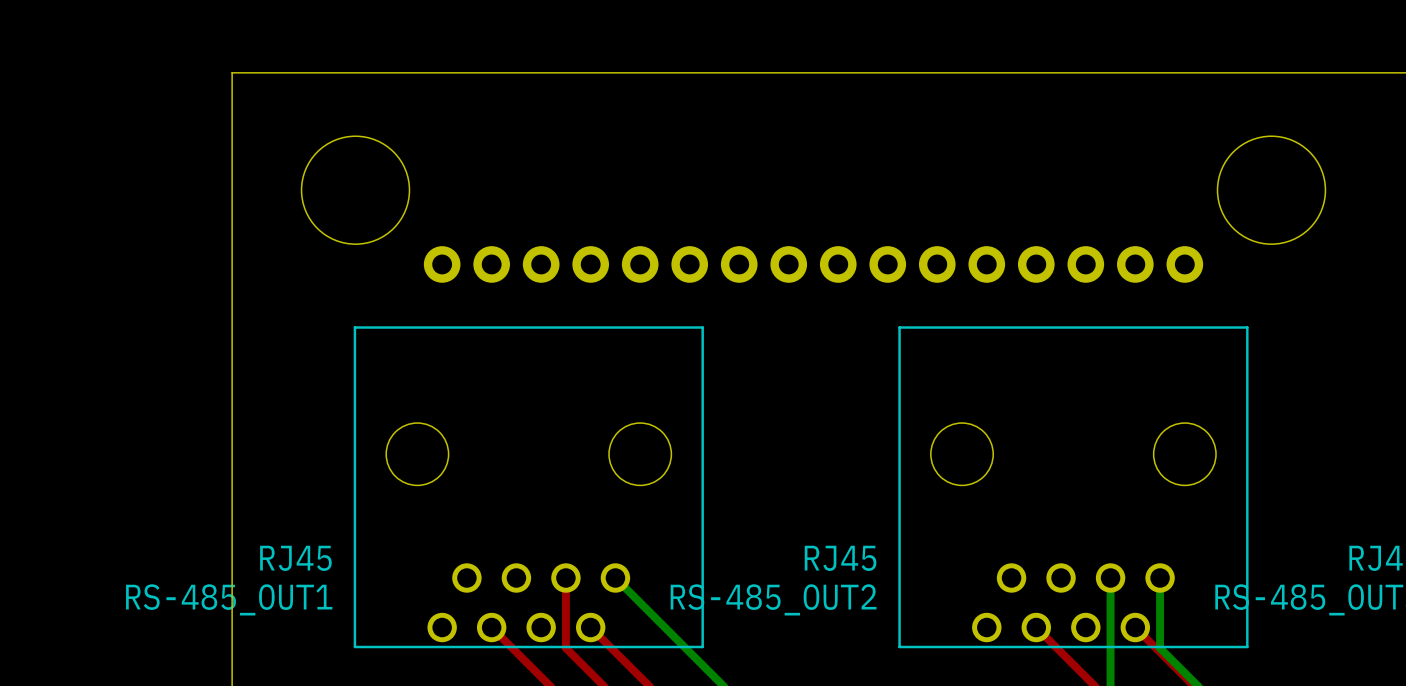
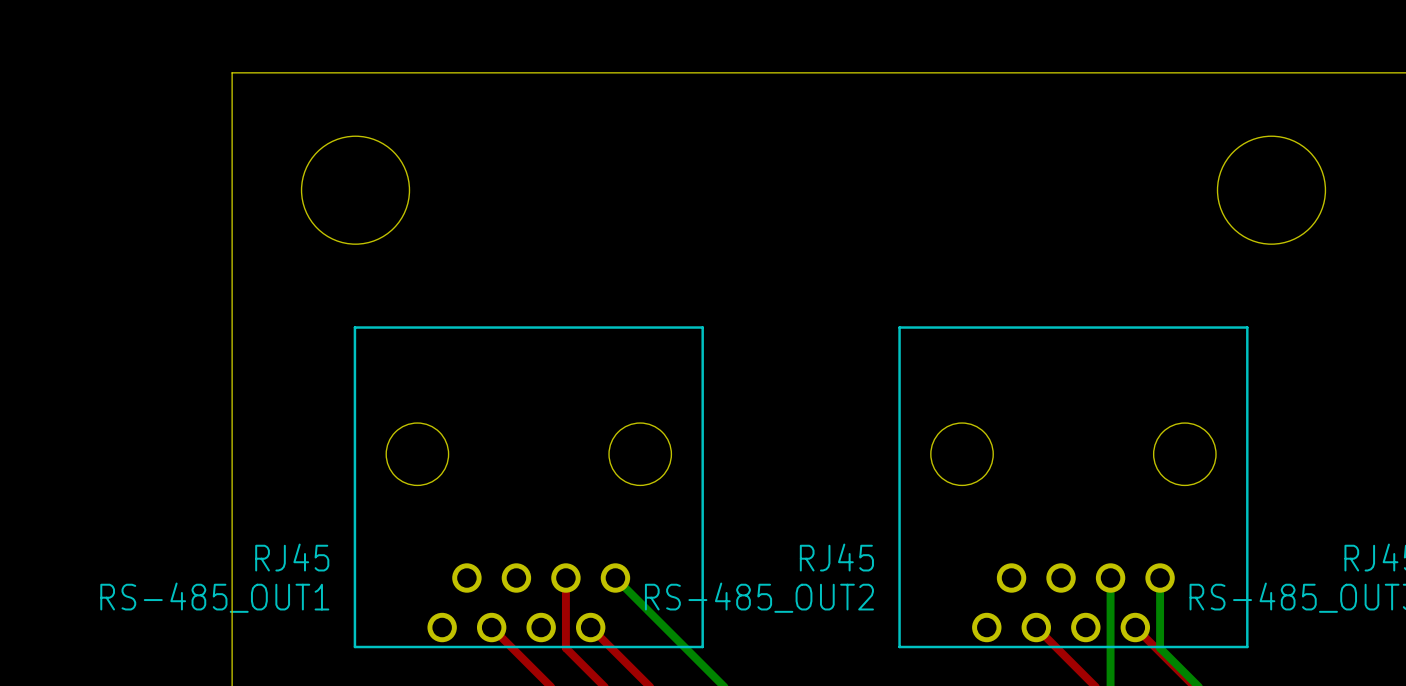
part: (813, 264) -> none

